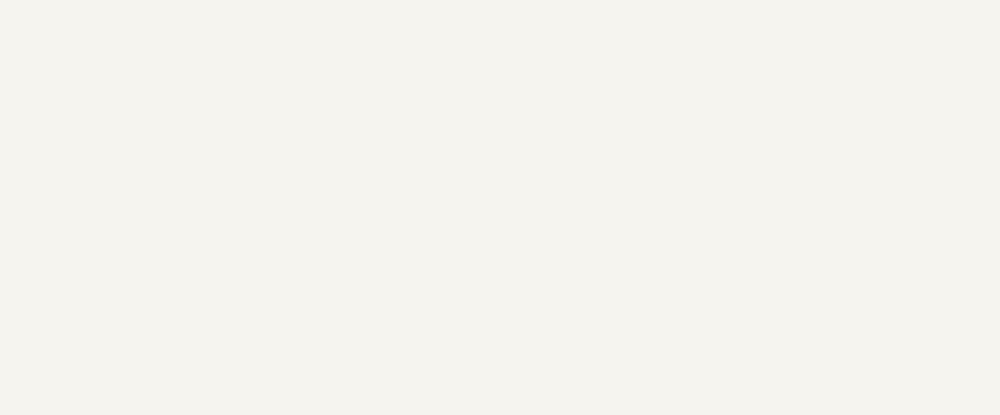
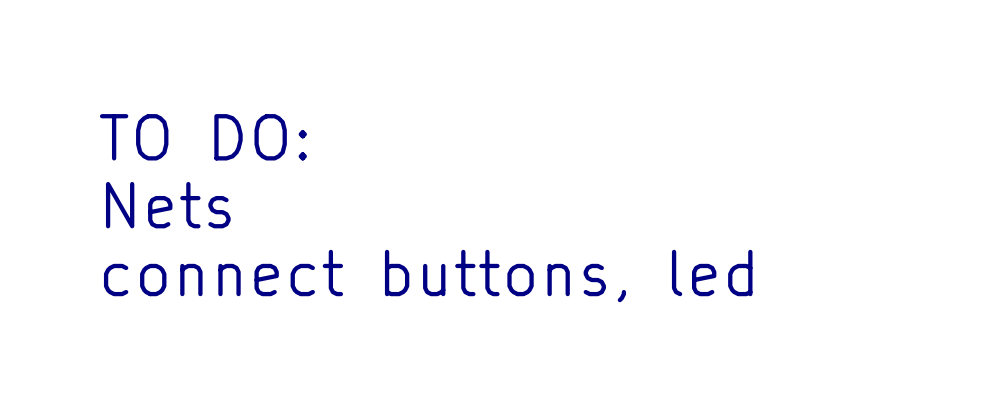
text: none -> TO DO: (203, 137)
text: none -> Nets (168, 205)
text: none -> connect buttons, led (428, 276)

